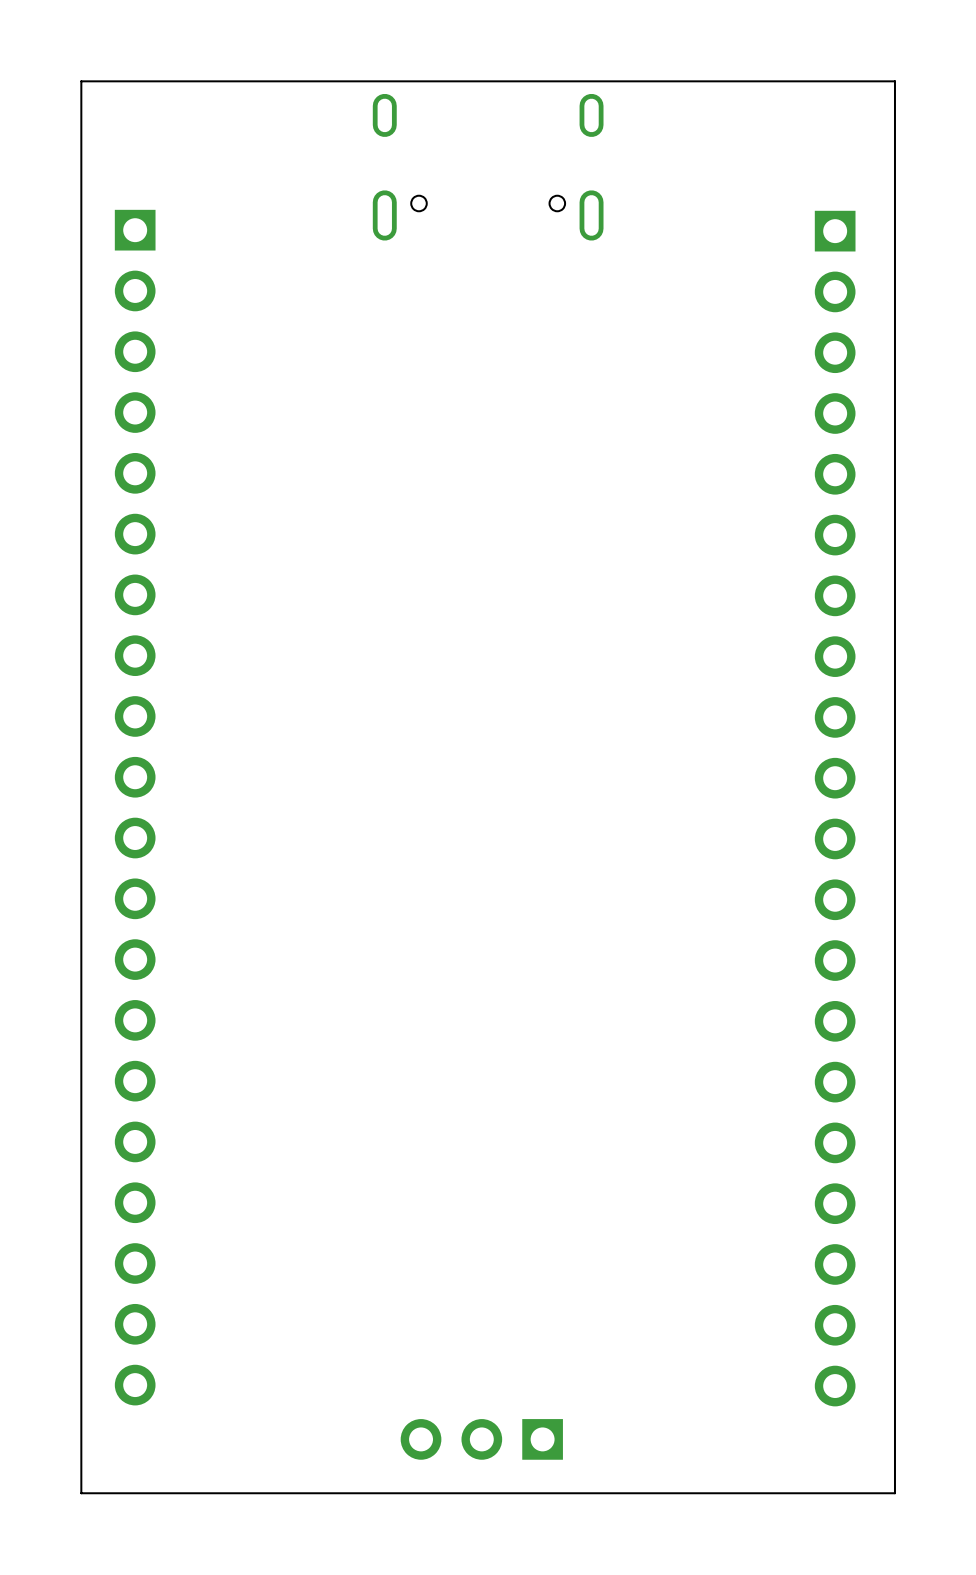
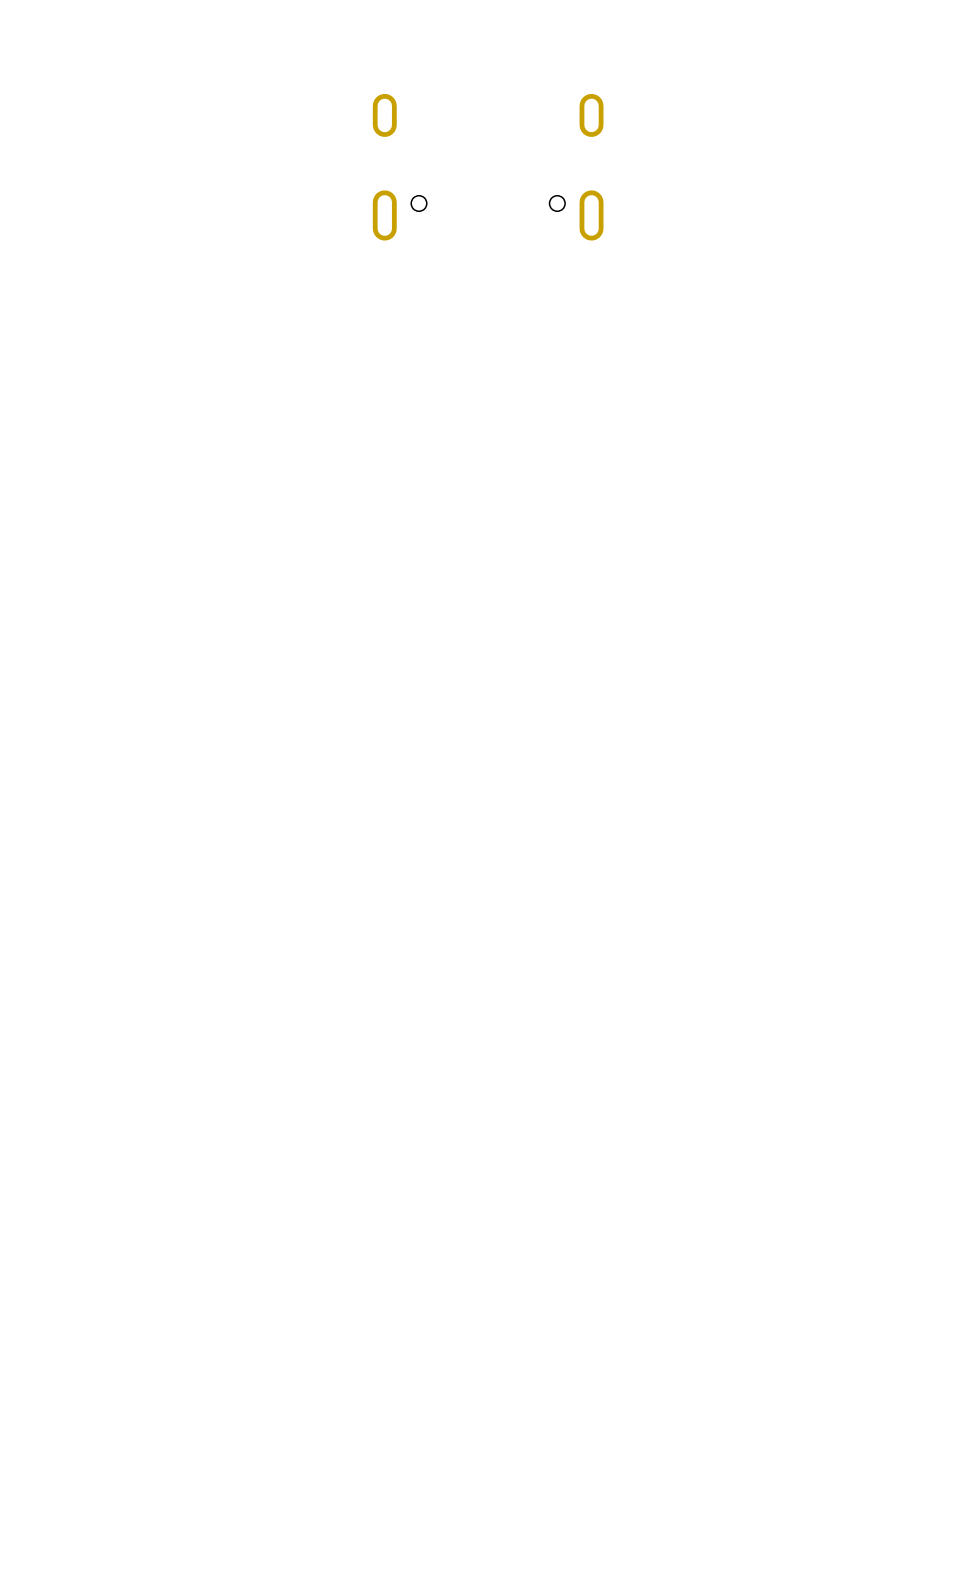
board edge: (894, 81) (81, 81) (81, 1493) (894, 1493) (894, 81) -> none
part: (135, 807) -> none
part: (835, 808) -> none
part: (481, 1439) -> none

